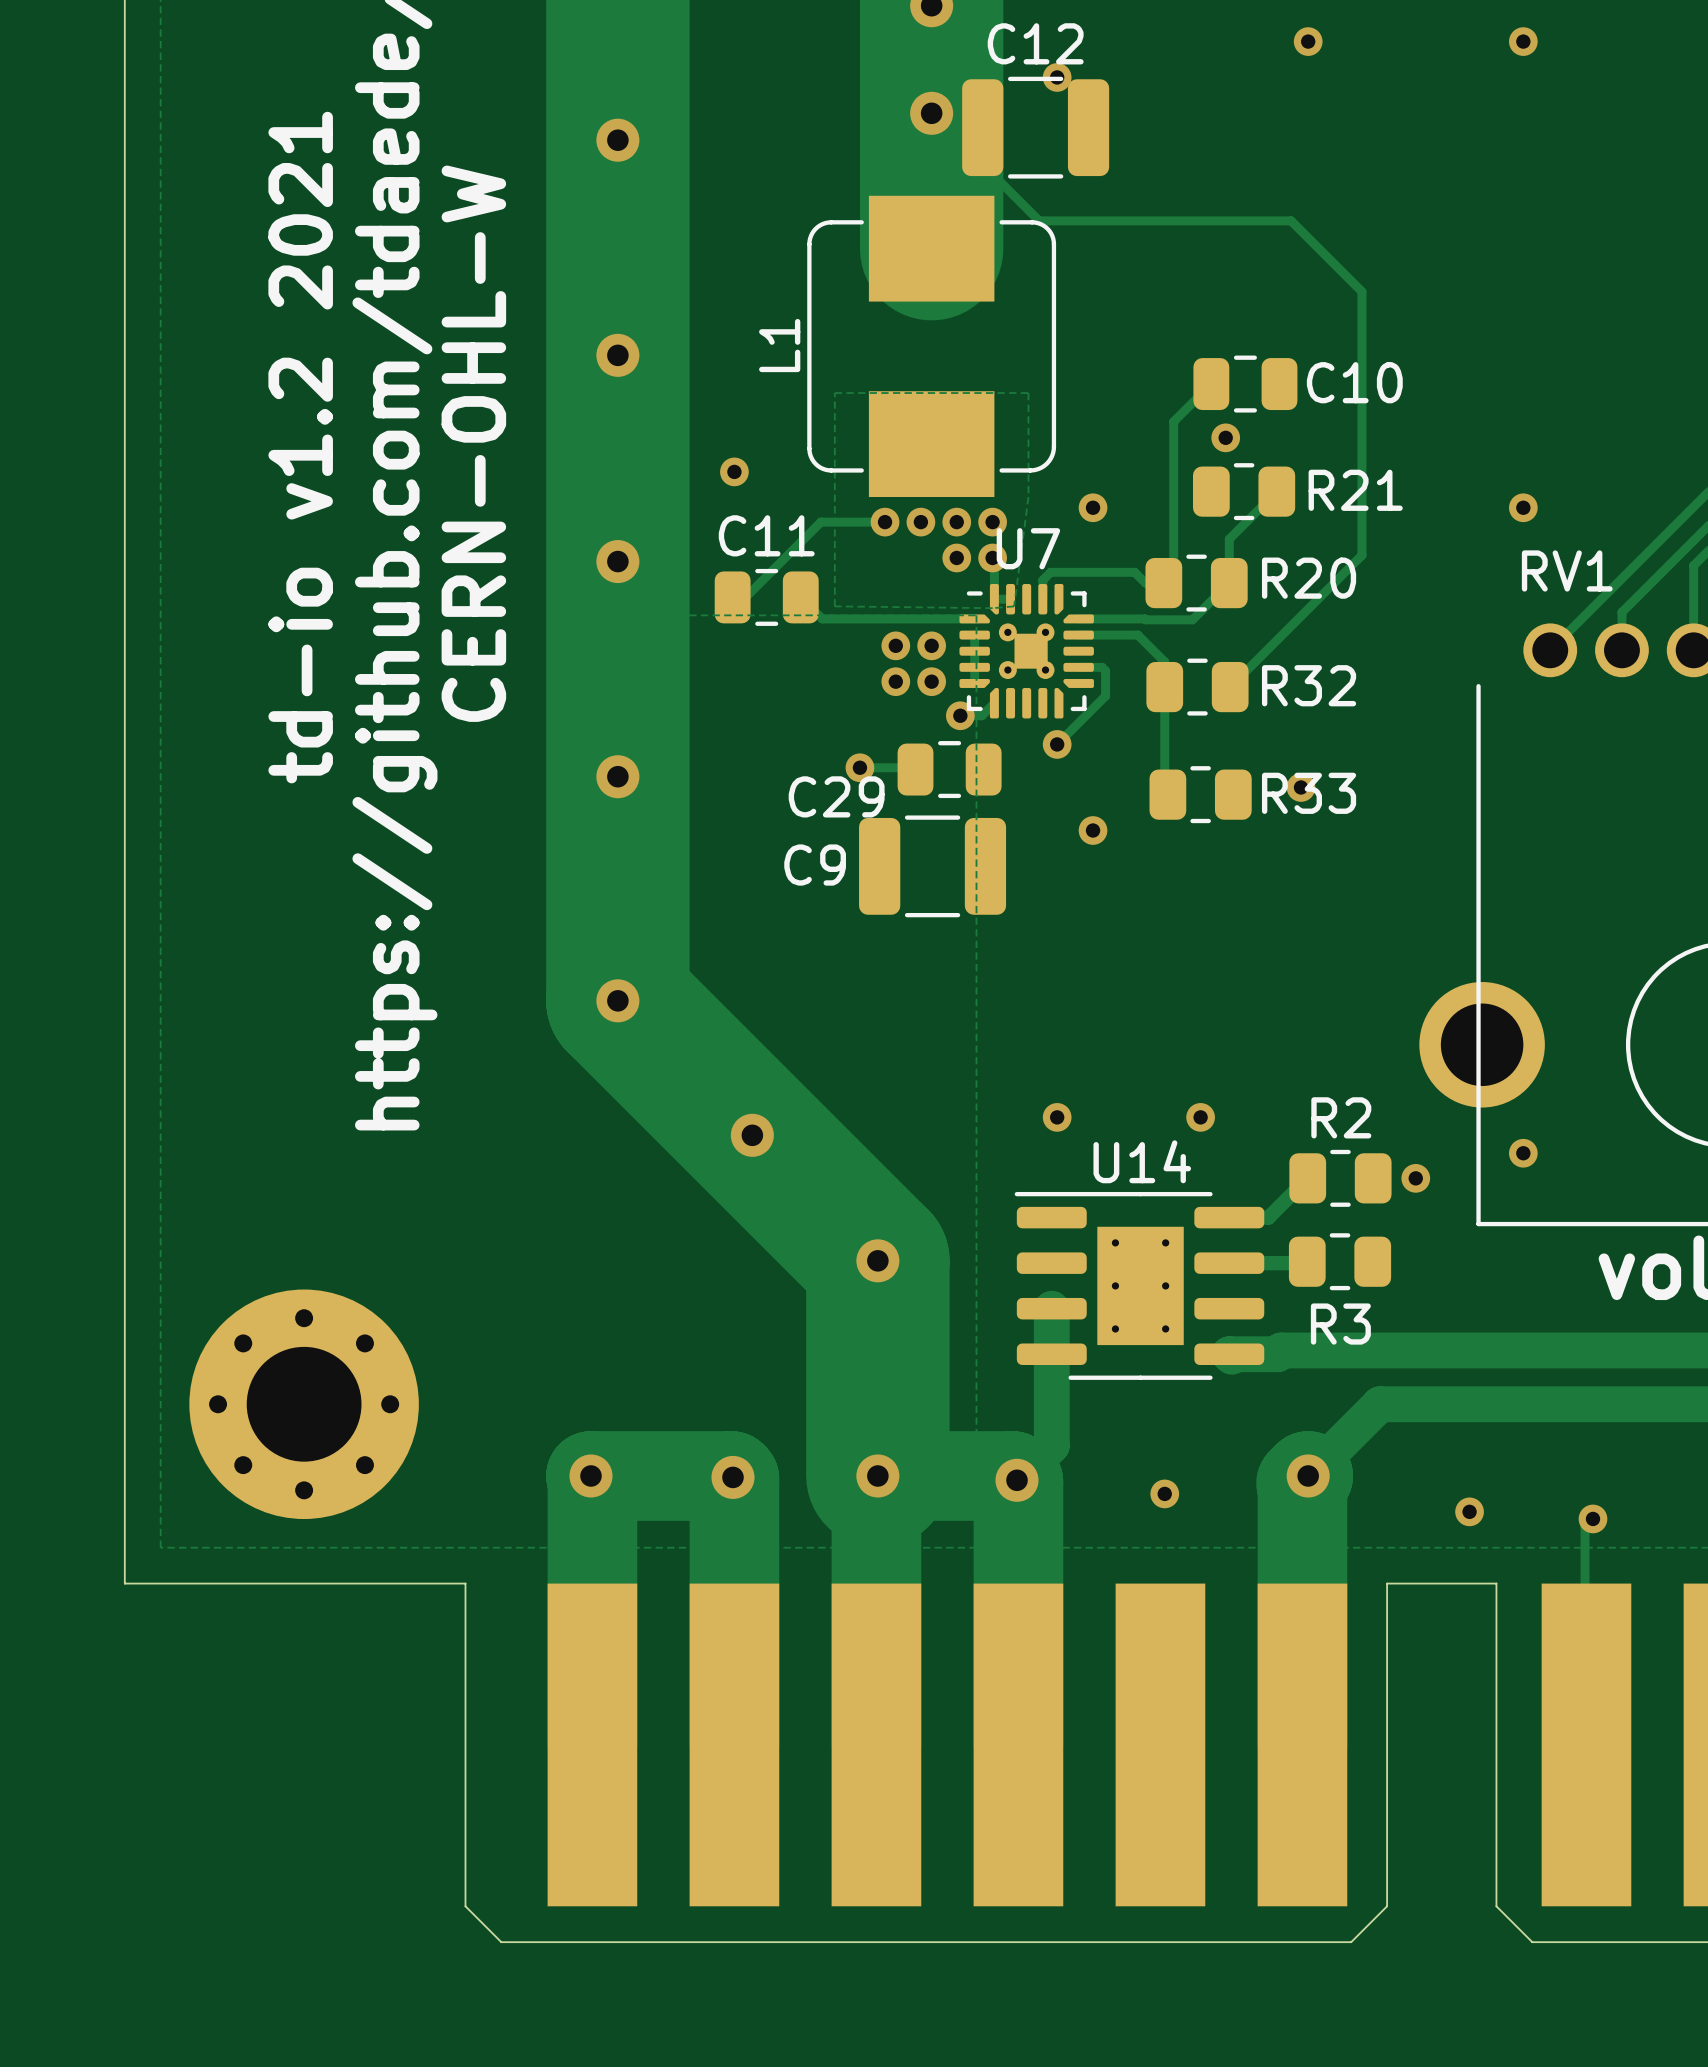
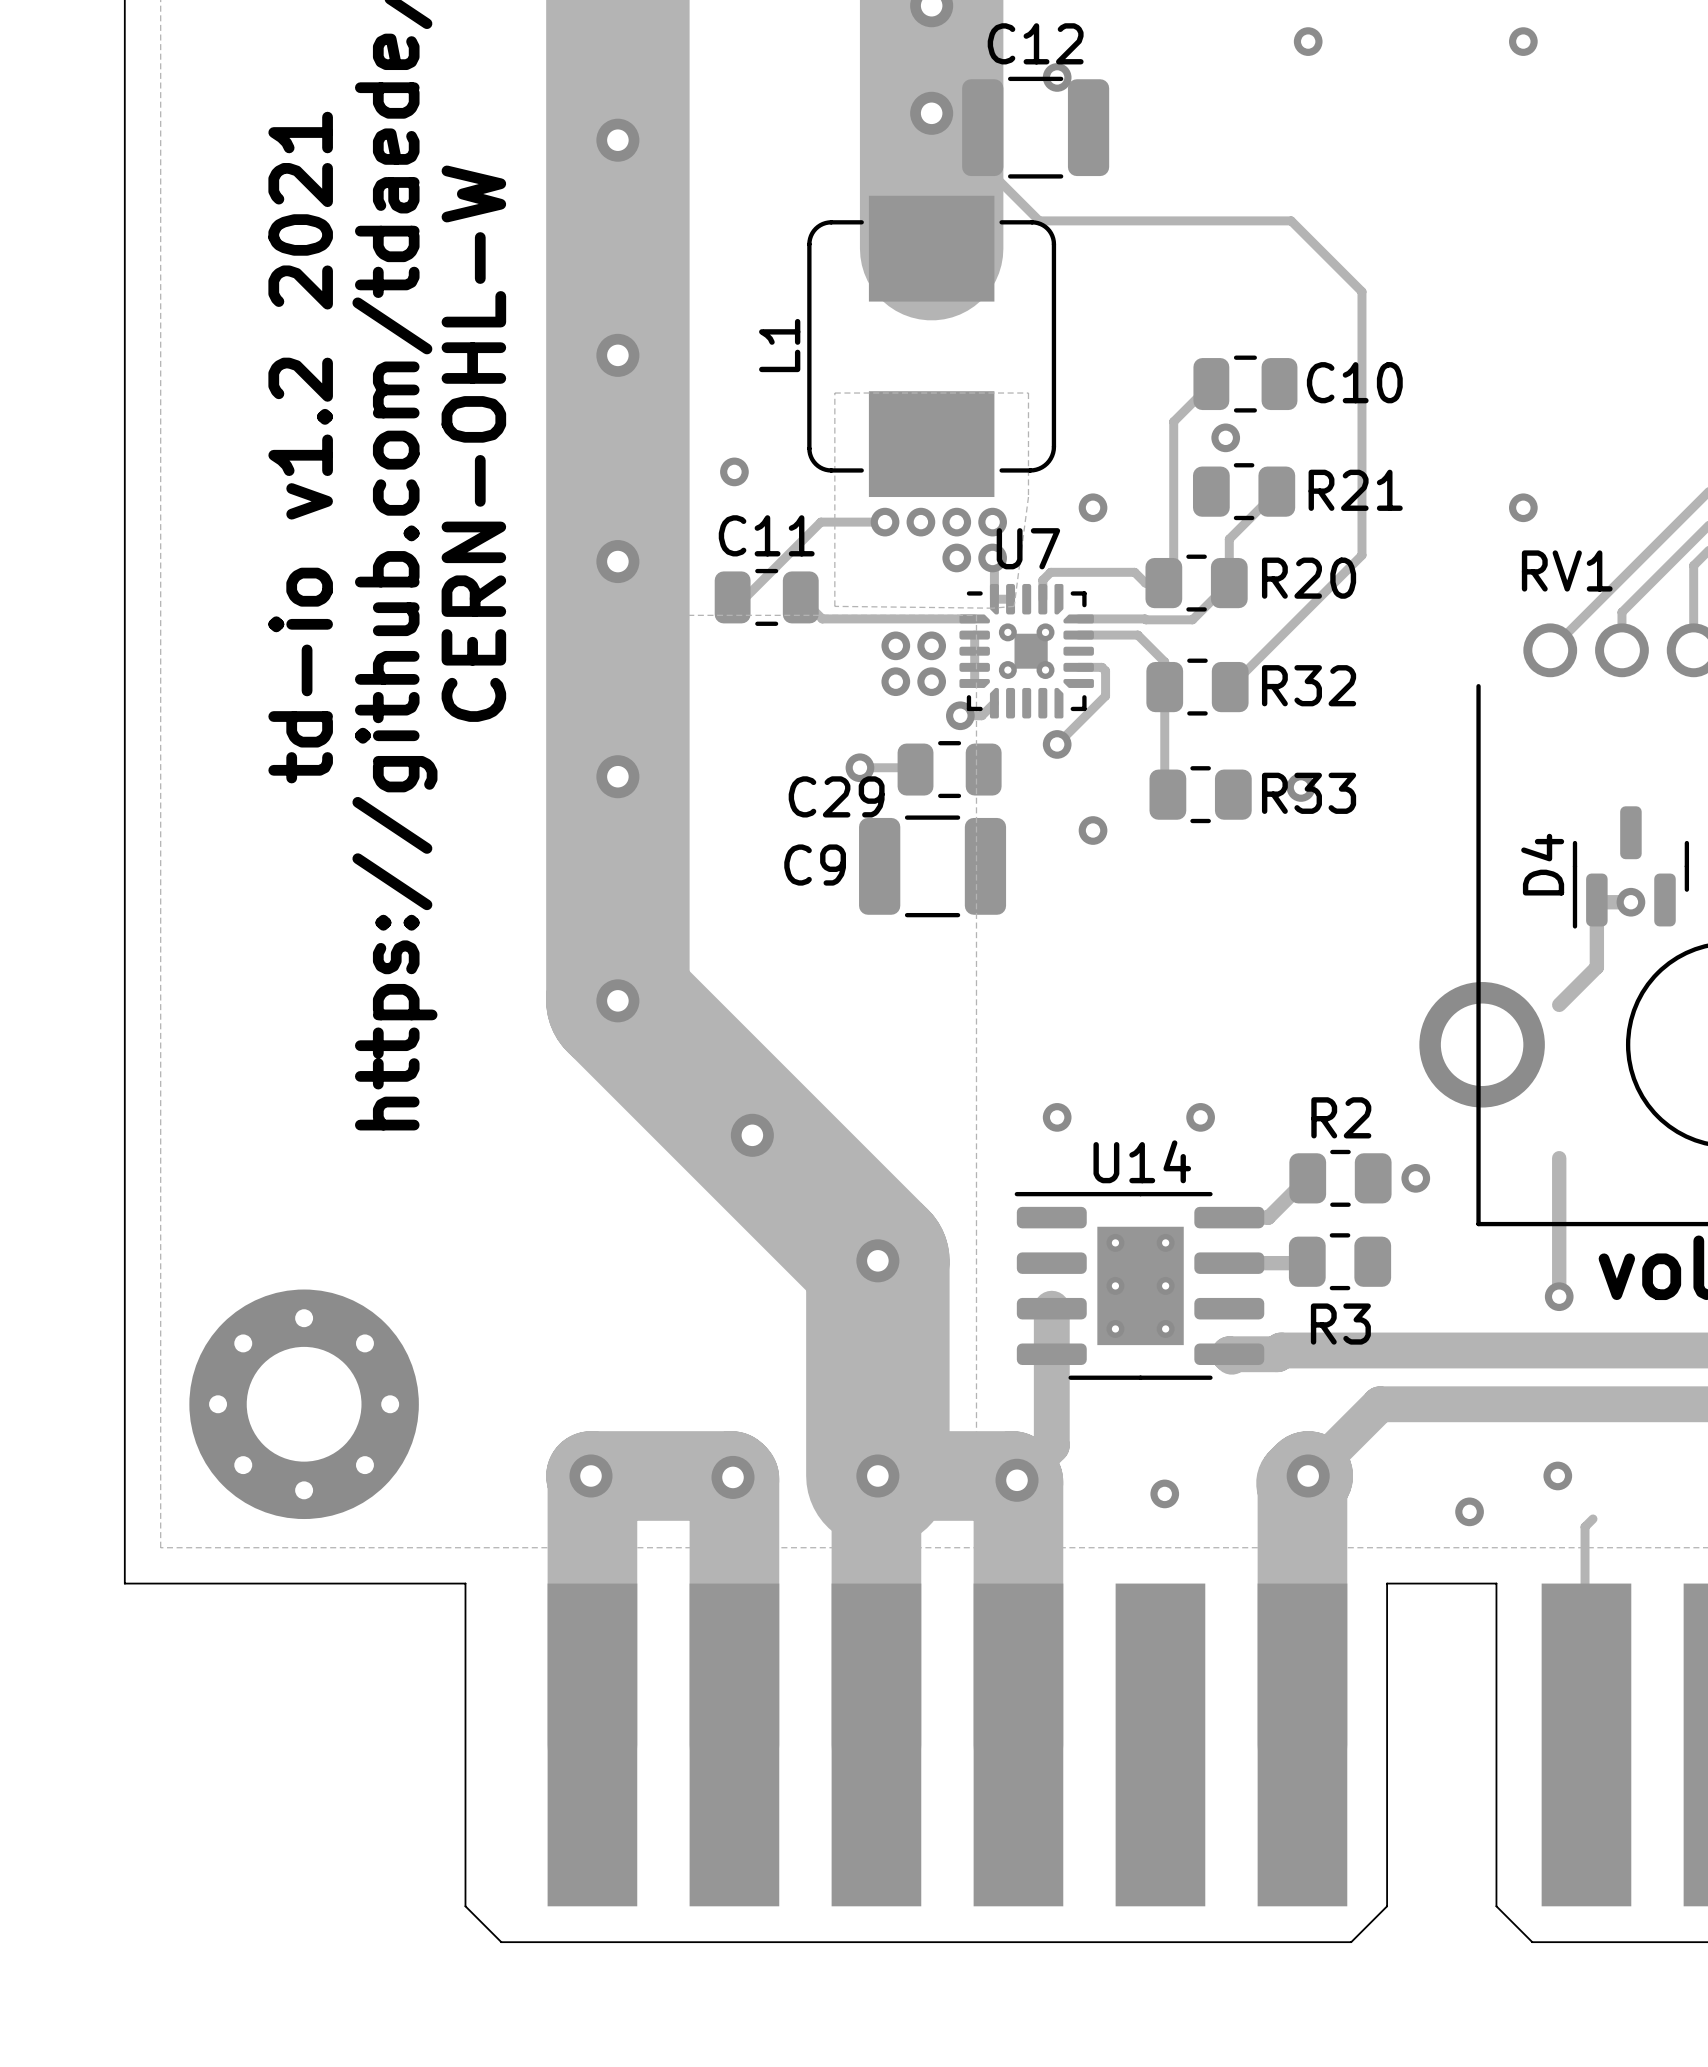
D4: none -> (1630, 867)
track: none -> (1630, 902) (1599, 902) (1596, 899) (1596, 967) (1559, 1004)
via: none -> (1630, 902)
via: (1523, 1153) -> none
track: none -> (1559, 1158) (1559, 1296)
via: none -> (1559, 1296)
via position: (1593, 1518) -> (1557, 1475)

